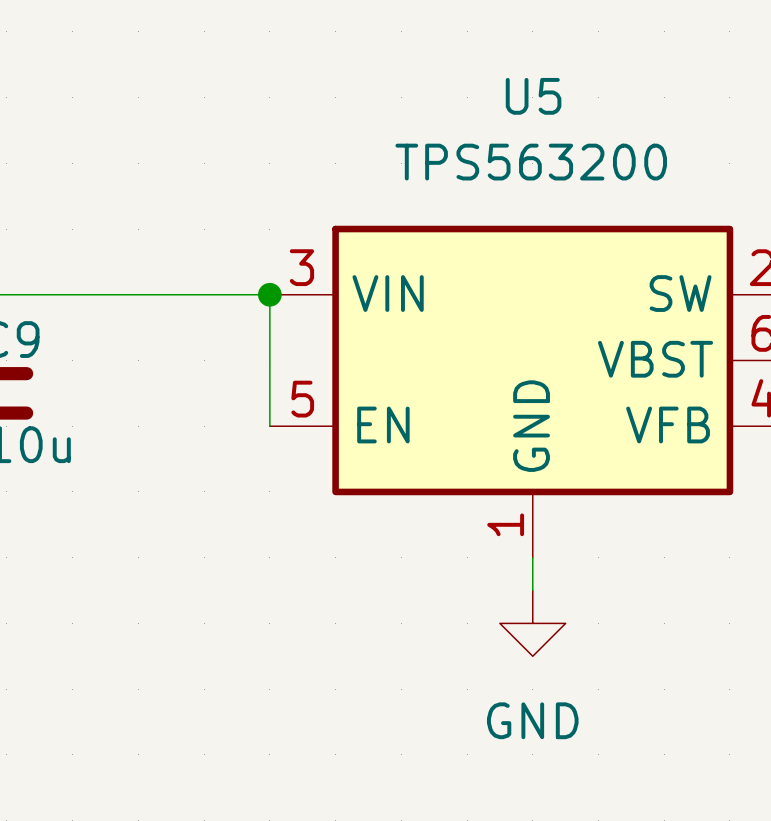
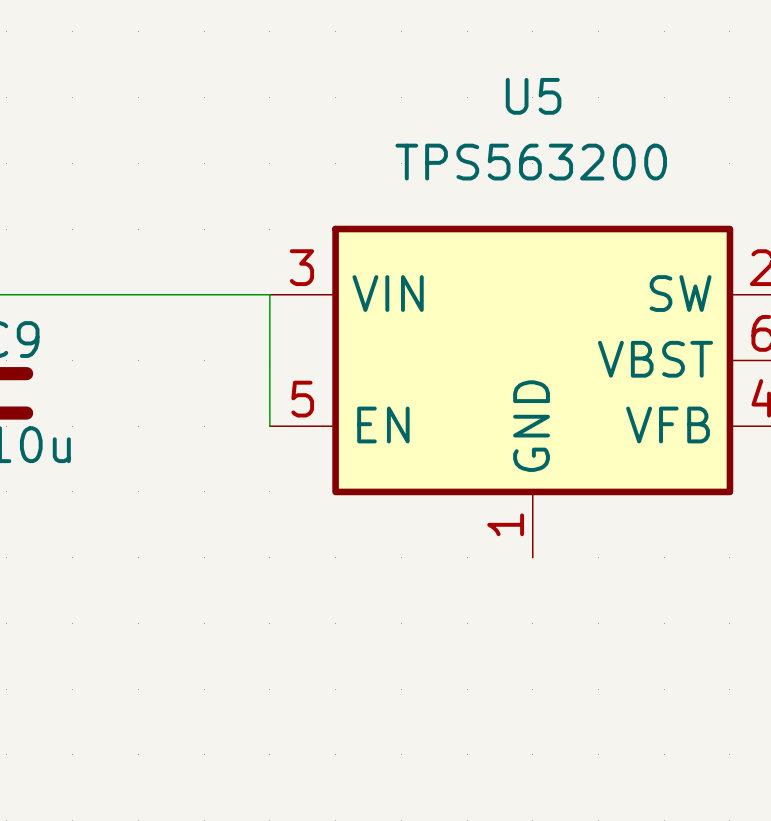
junction: (269, 294) -> none
wire: (532, 557) (532, 590) -> none
power symbol: GND (532, 623) -> none

